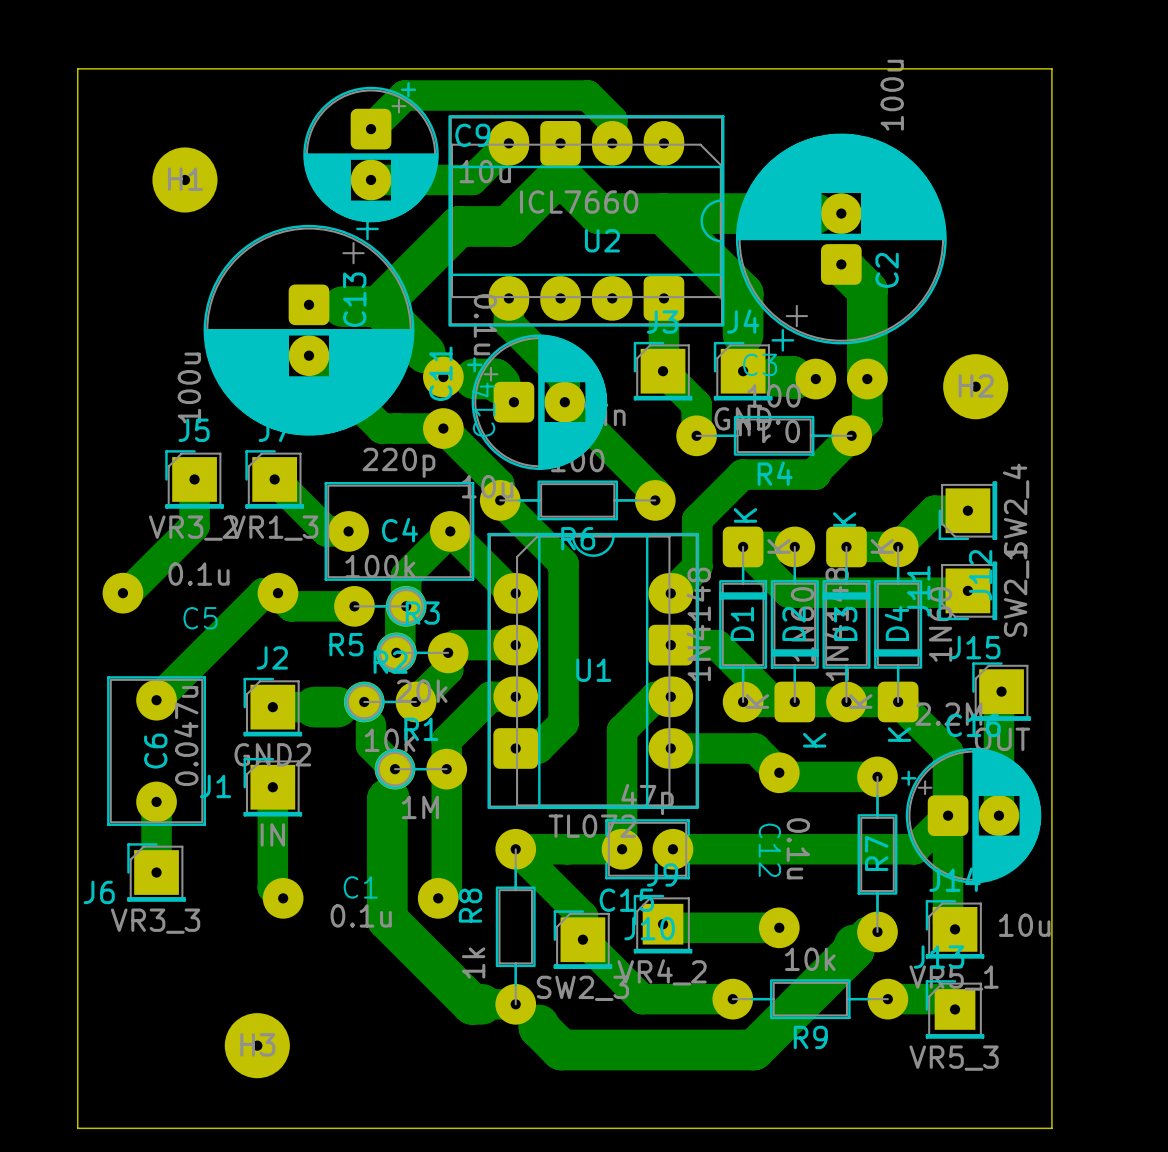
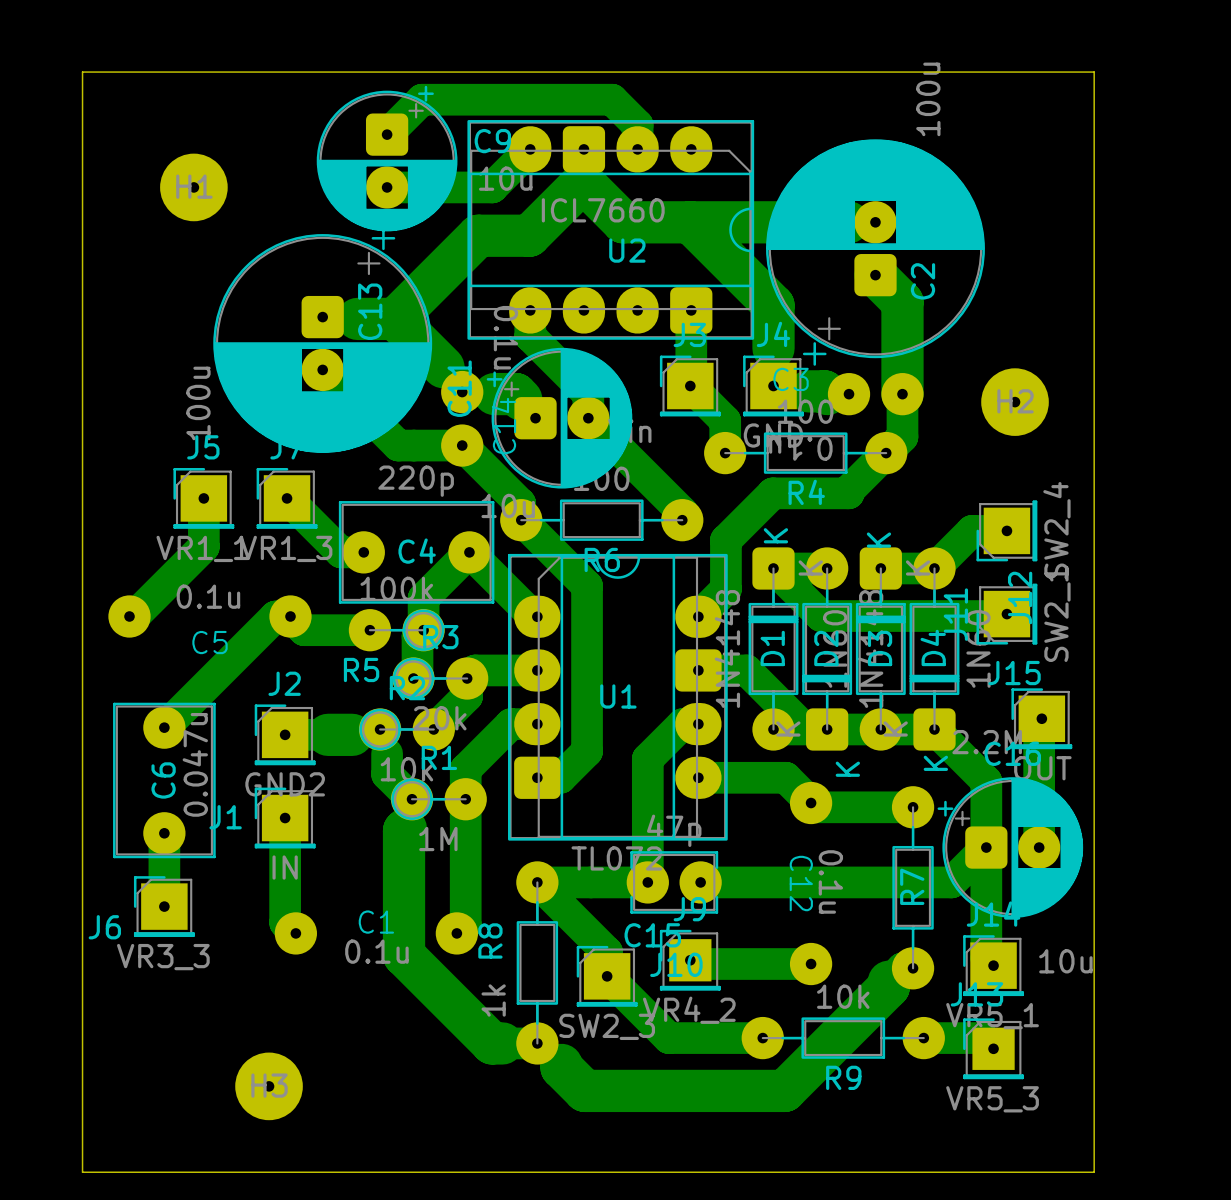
J5 value: VR3_2 (193, 528) -> VR1_1 (202, 548)

